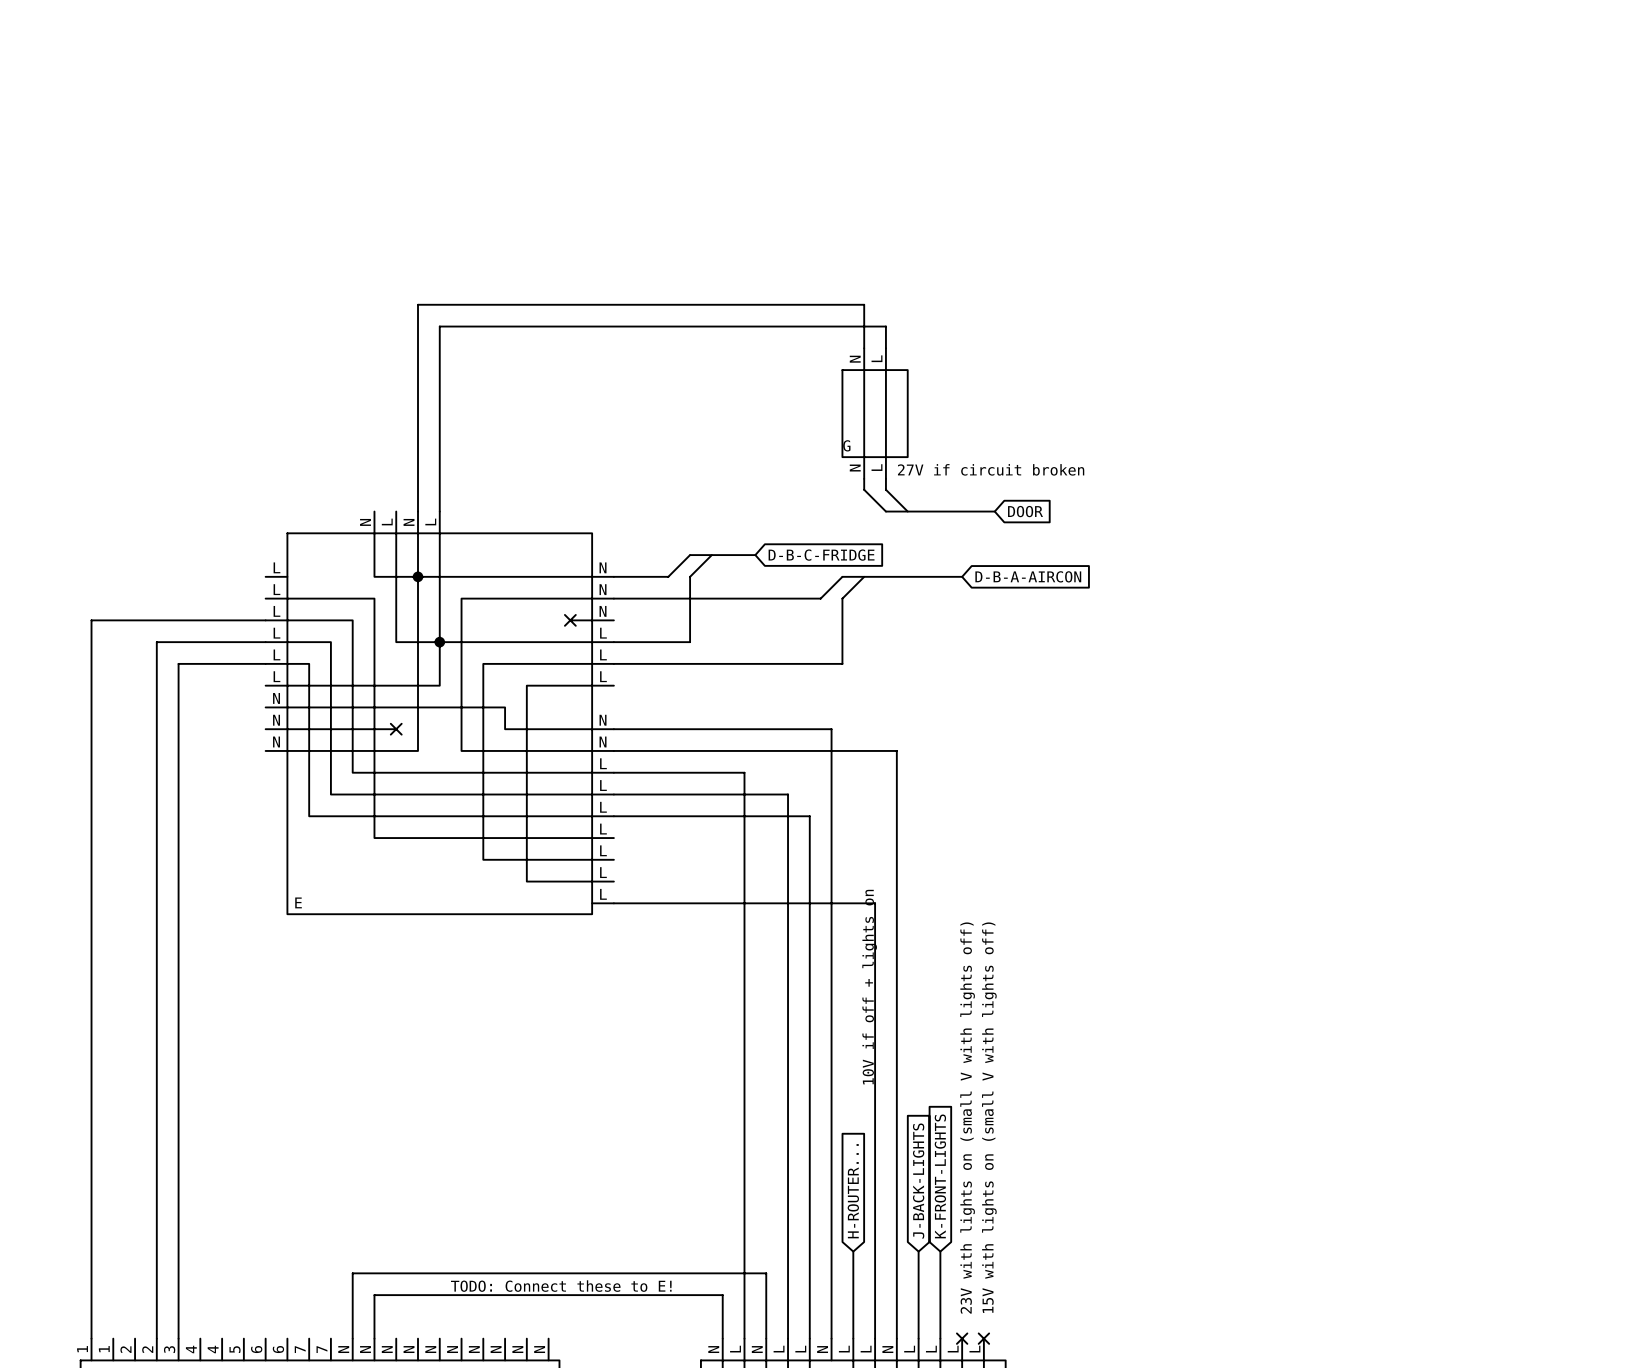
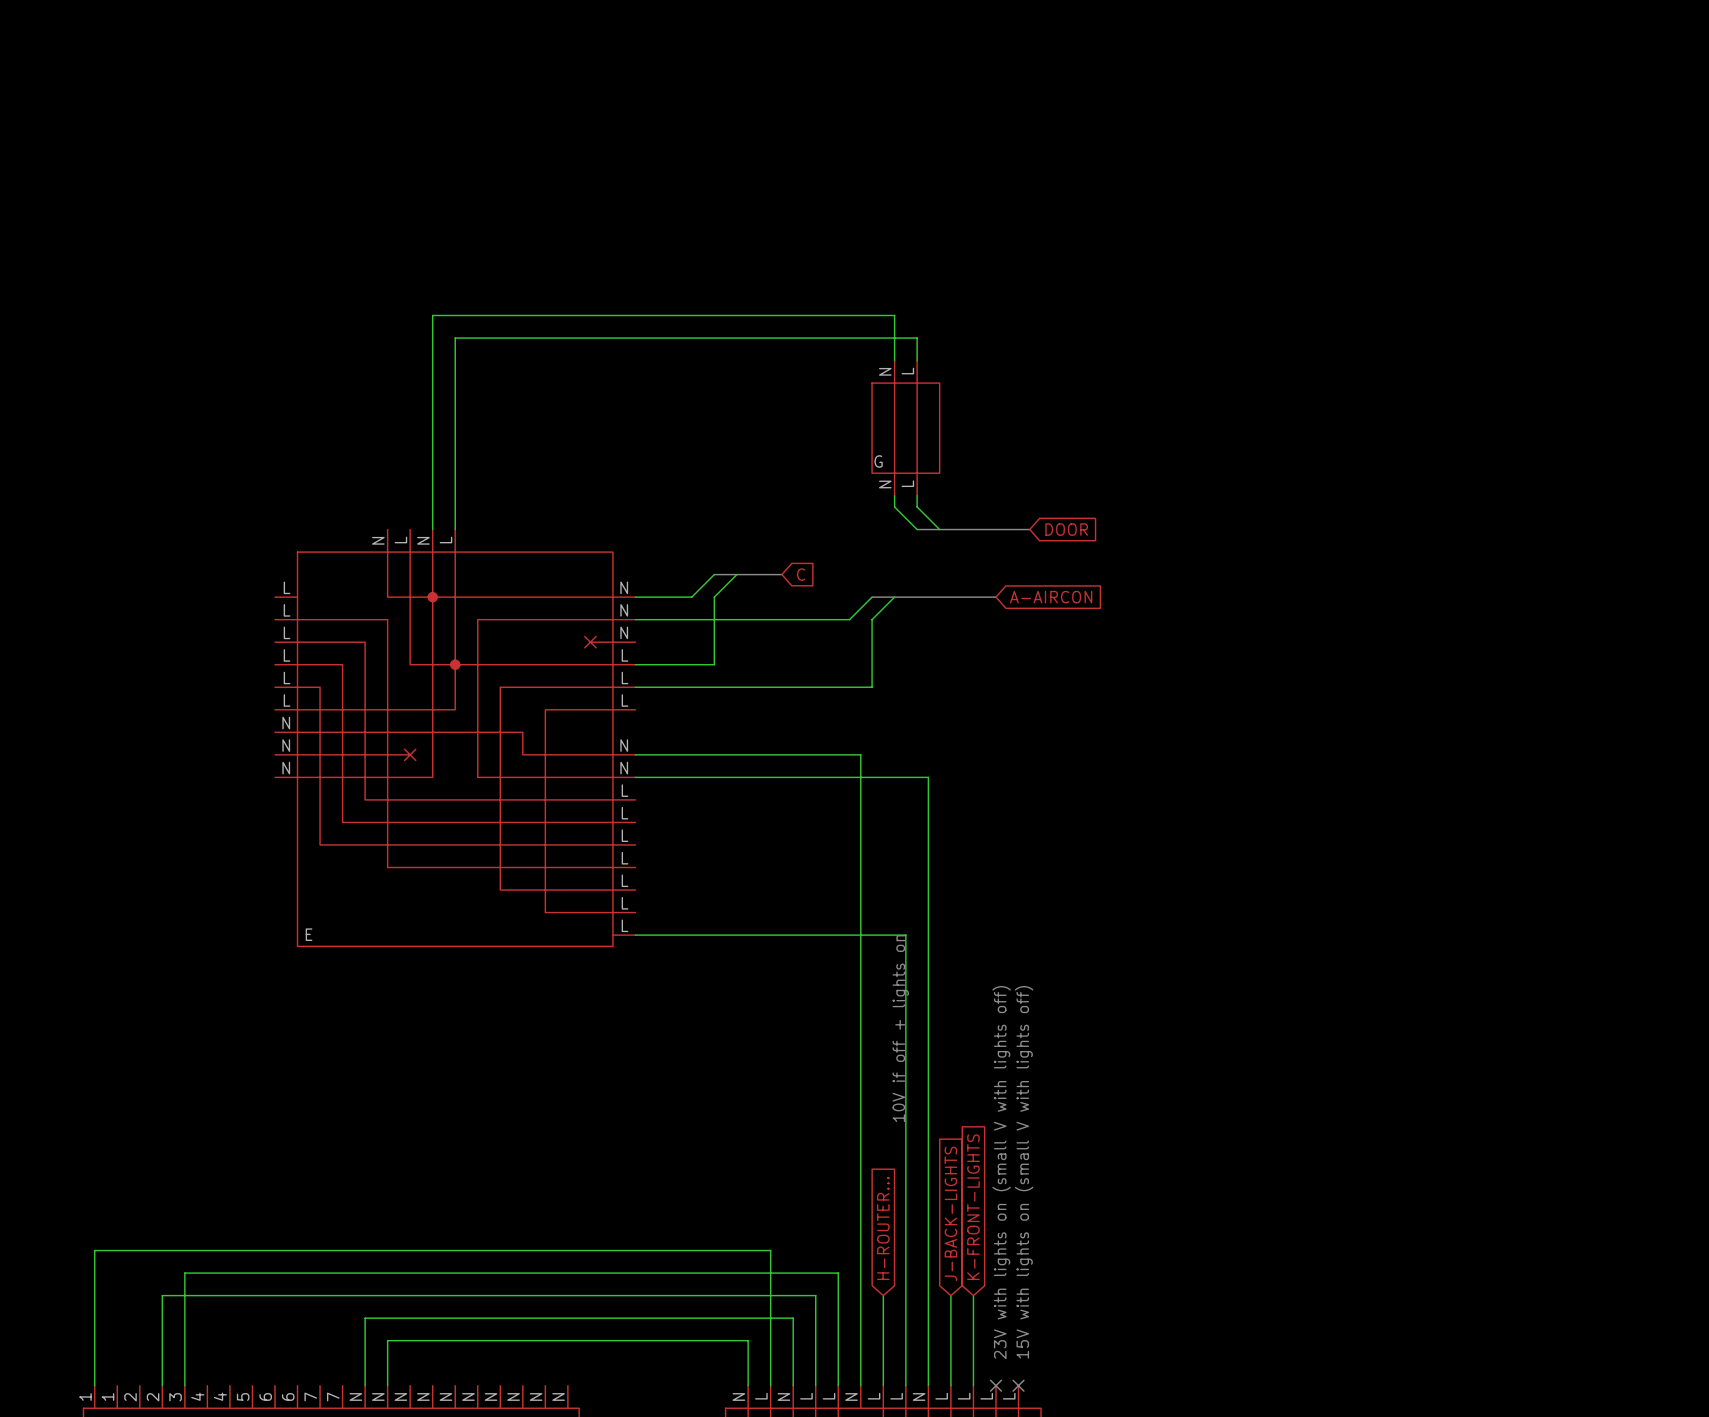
text: 27V if circuit broken (991, 469) -> none
global label: D-B-C-FRIDGE (821, 555) -> C (801, 574)
global label: D-B-A-AIRCON (1028, 576) -> A-AIRCON (1051, 597)
wire: (265, 620) (91, 620) (91, 1208) -> none
wire: (265, 642) (156, 642) (156, 1251) -> none
wire: (265, 663) (178, 663) (178, 1229) -> none
wire: (613, 772) (744, 772) (744, 1208) -> (94, 1250) (770, 1250)
wire: (613, 794) (788, 794) (788, 1251) -> (162, 1295) (815, 1295)
wire: (613, 816) (809, 816) (809, 1229) -> (184, 1273) (838, 1273)
text: TODO: Connect these to E! (561, 1286) -> none

